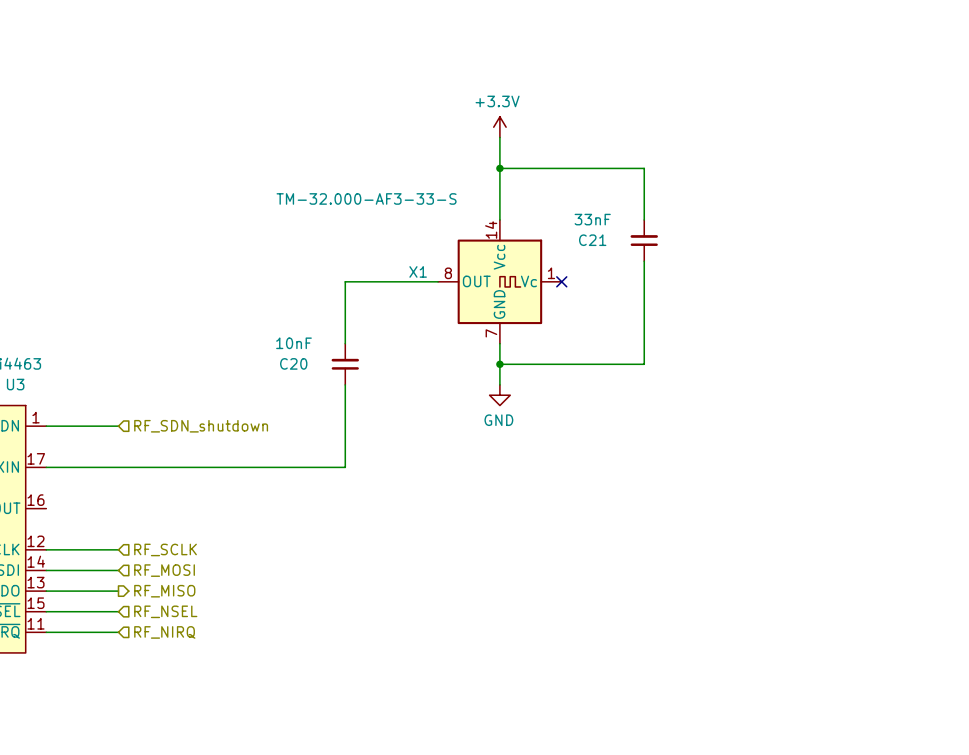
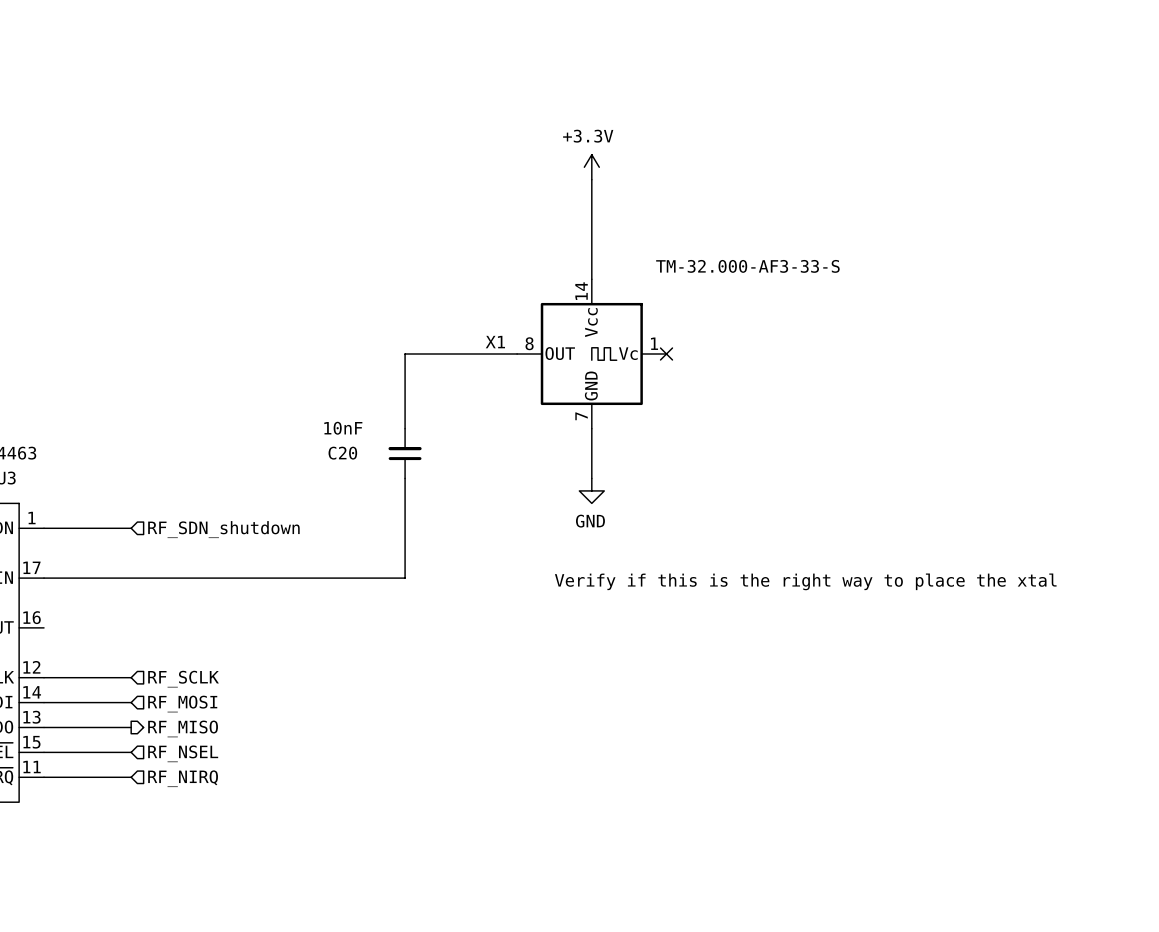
wire: (499, 168) (644, 168) (644, 219) -> none
junction: (499, 168) -> none
X1 value position: TM-32.000-AF3-33-S (366, 198) -> TM-32.000-AF3-33-S (747, 266)
C21: 33nF (644, 240) -> none
wire: (644, 261) (644, 364) (499, 364) -> none
junction: (499, 364) -> none
text: none -> Verify if this is the right way to place the xtal (805, 581)

